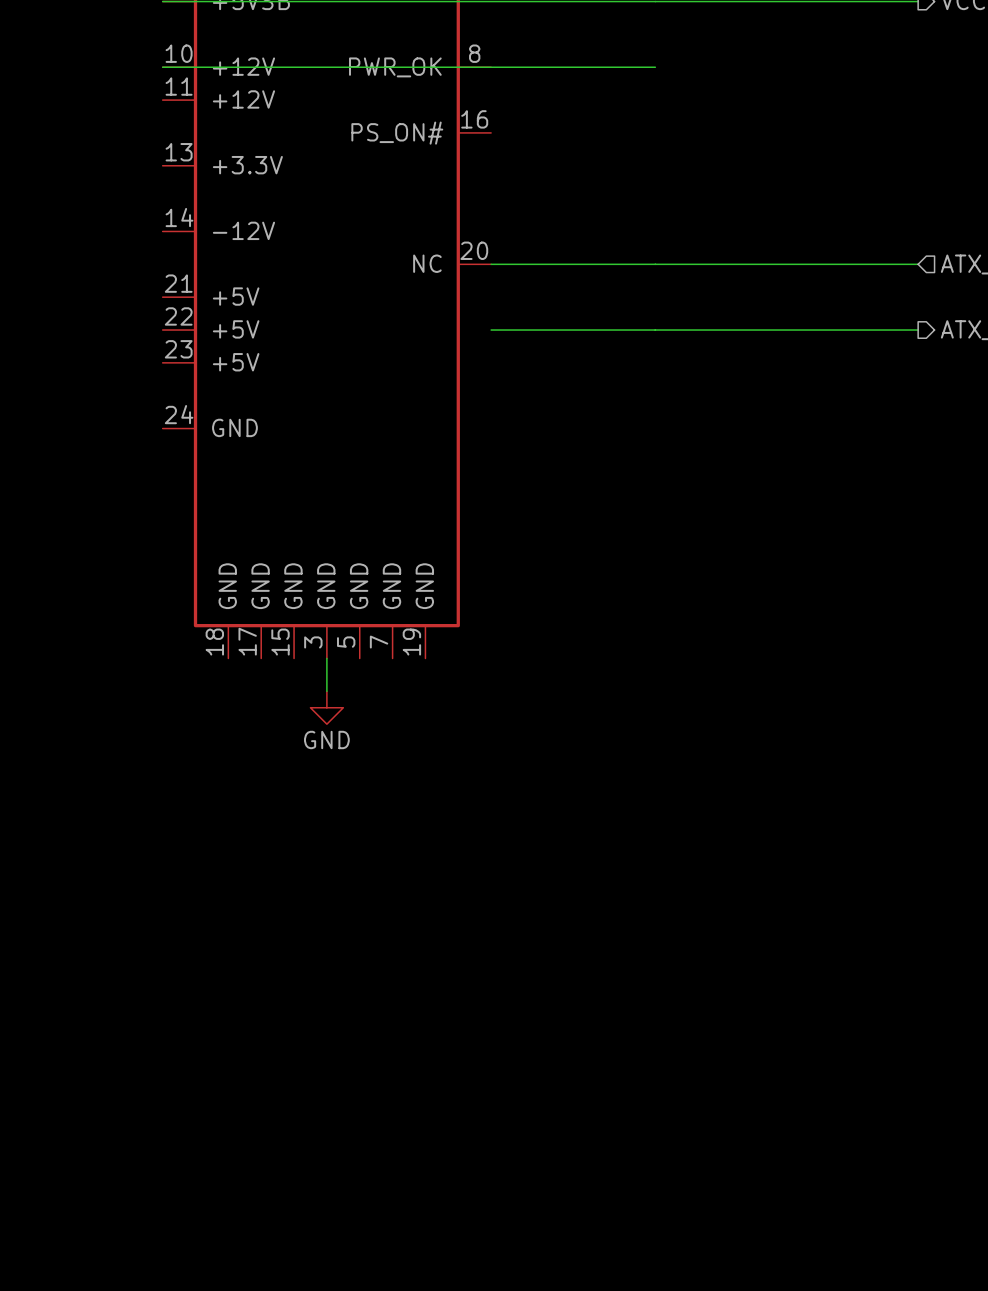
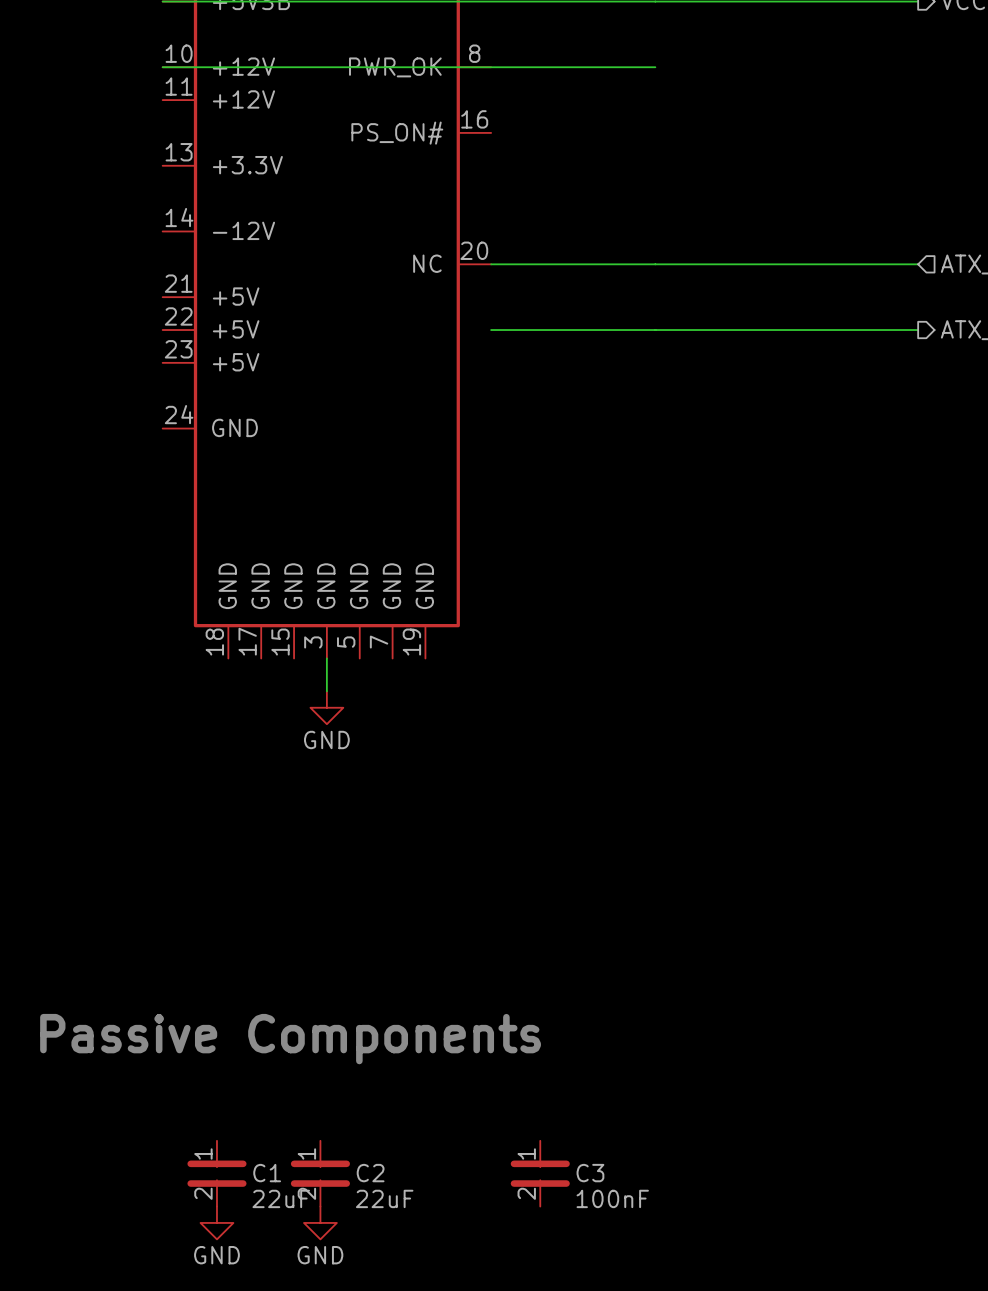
text: none -> Passive Components (290, 1039)
C1: none -> 22uF (216, 1173)
C2: none -> 22uF (320, 1173)
C3: none -> 100nF (540, 1173)
power symbol: none -> GND (216, 1222)
power symbol: none -> GND (320, 1222)

